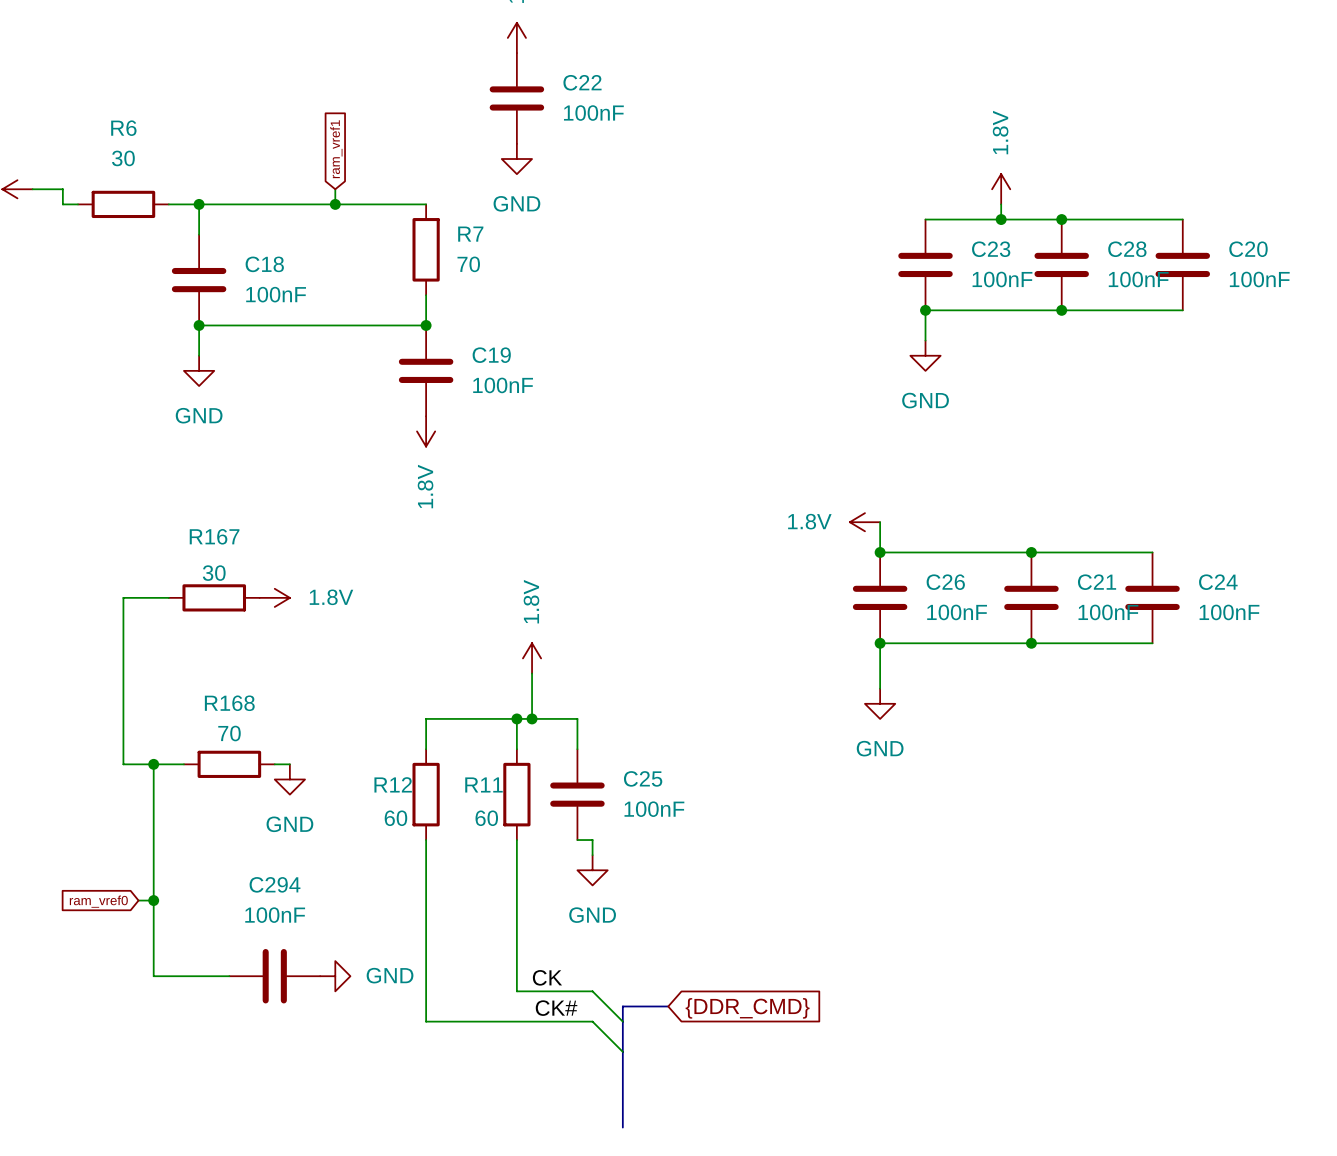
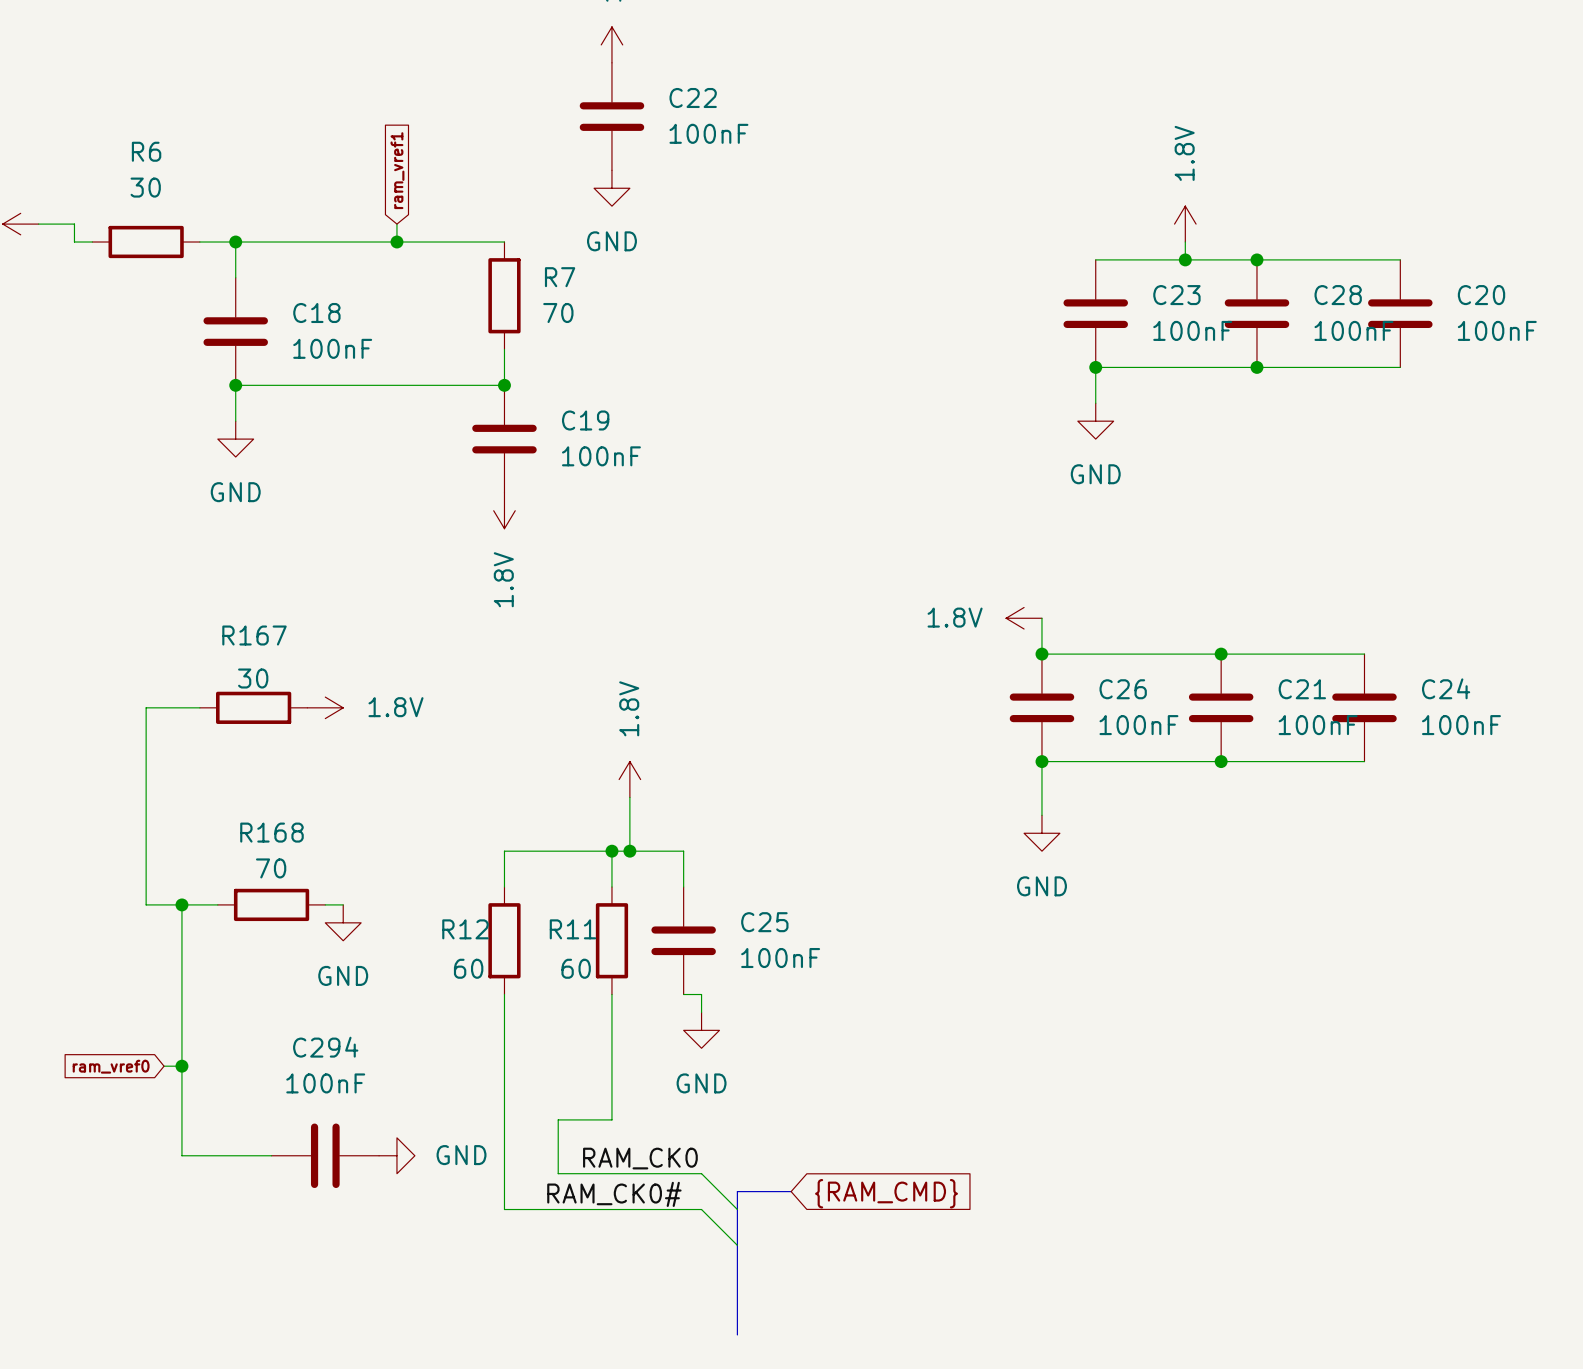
wire: (516, 945) (516, 991) -> (611, 1119) (558, 1119) (558, 1173) (611, 1173)
label: CK (547, 977) -> none
label: none -> RAM_CK0 (640, 1158)
label: CK# (556, 1008) -> RAM_CK0# (614, 1194)
global label: {DDR_CMD} (747, 1008) -> {RAM_CMD} (886, 1193)

